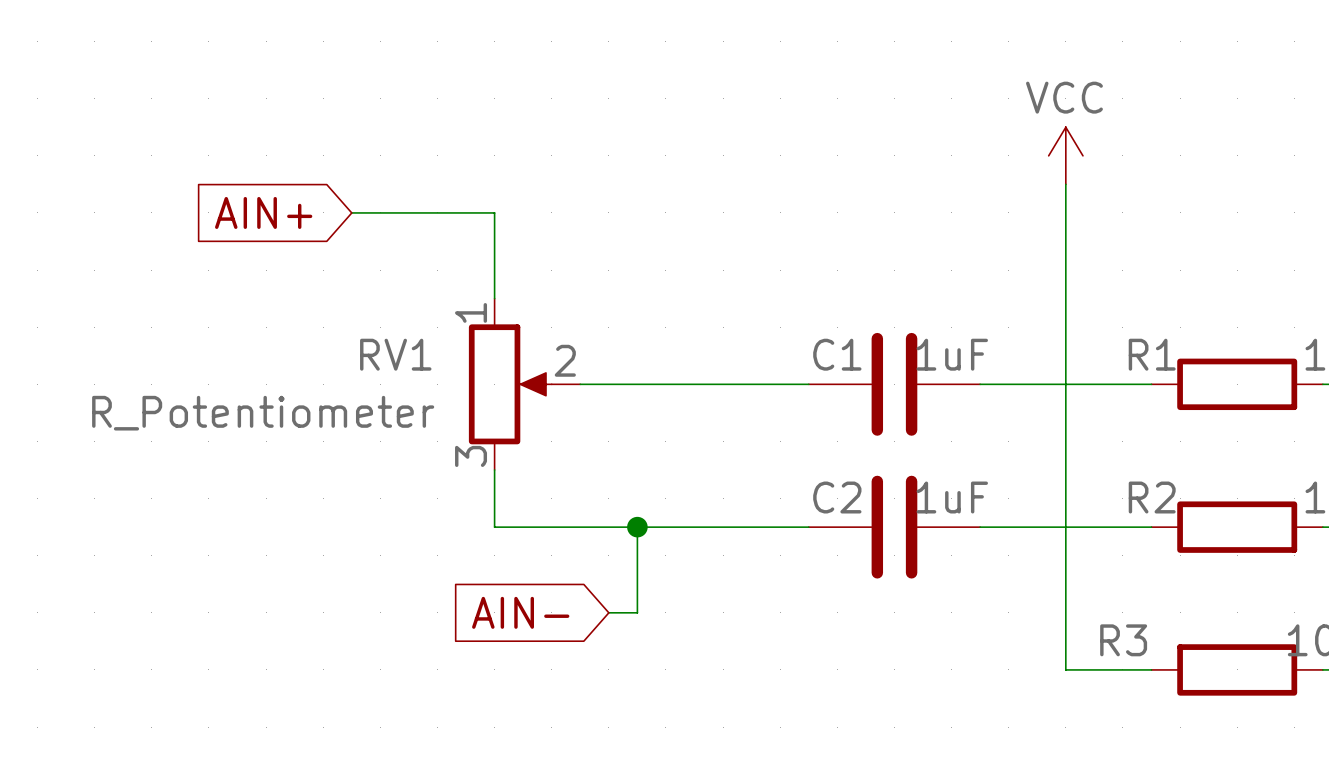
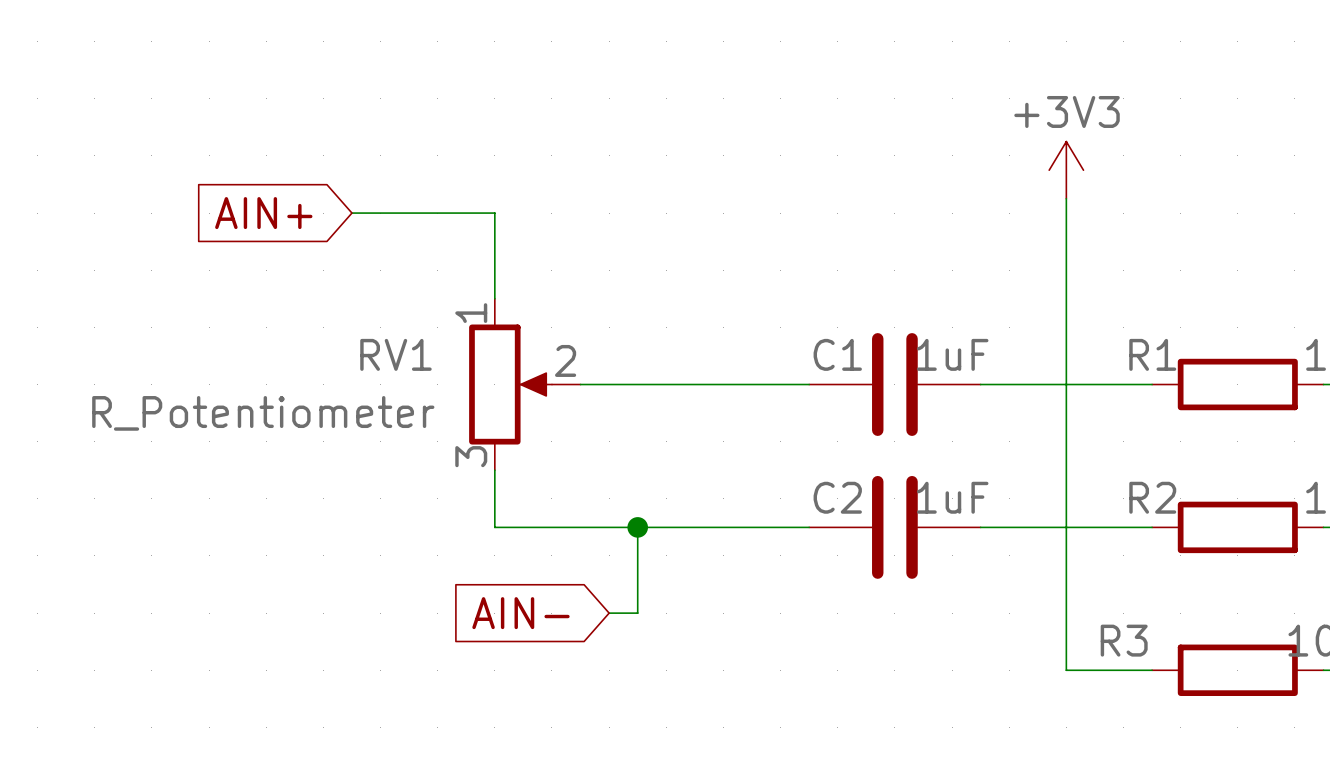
power symbol: VCC (1065, 155) -> +3V3 (1066, 170)

